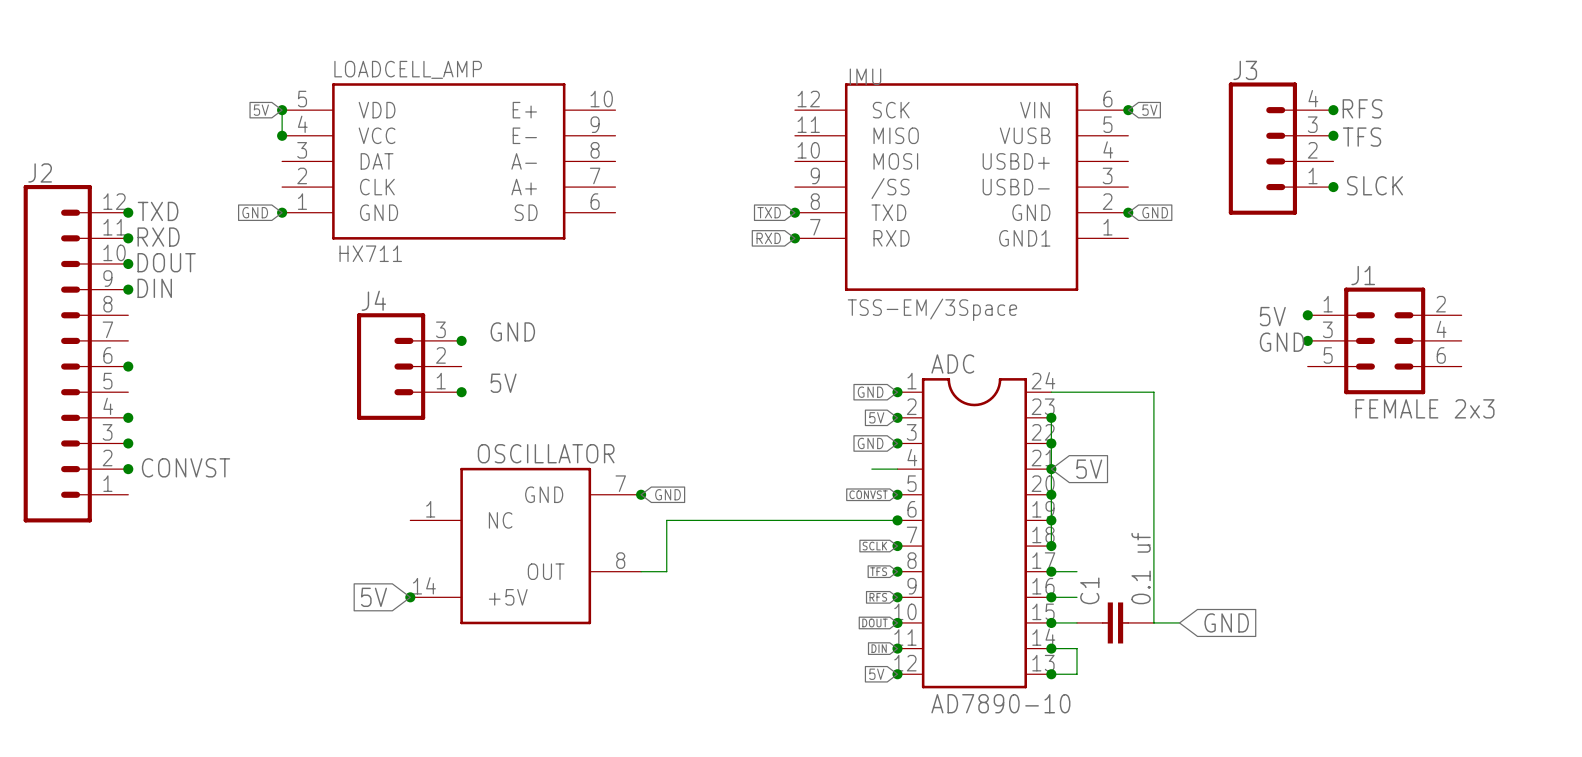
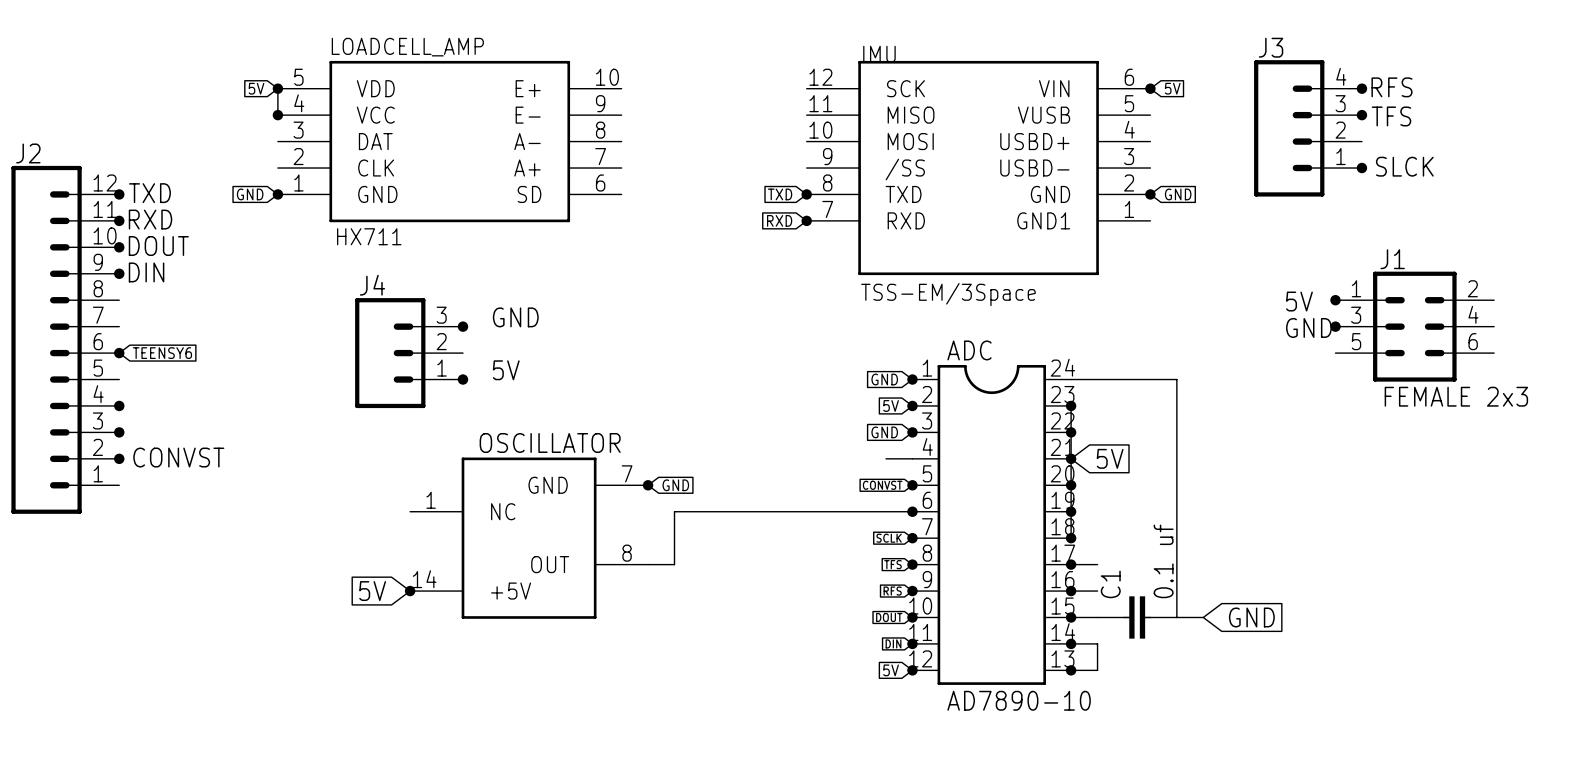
global label: none -> TEENSY6 (162, 353)

